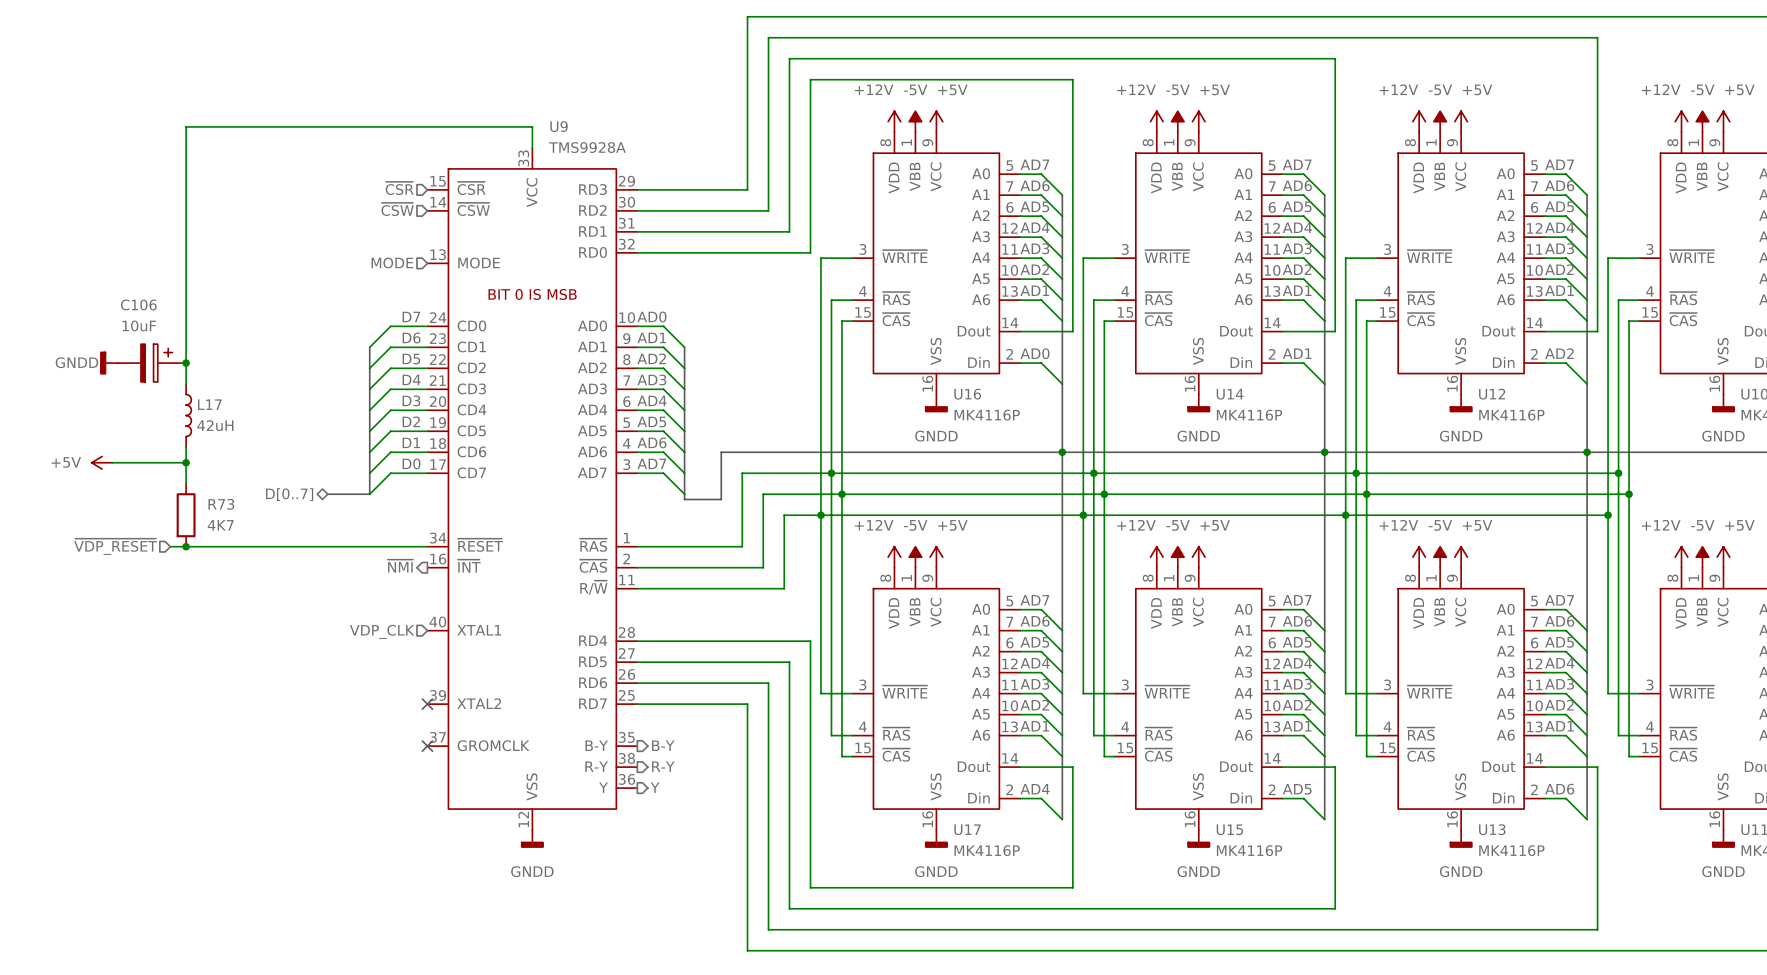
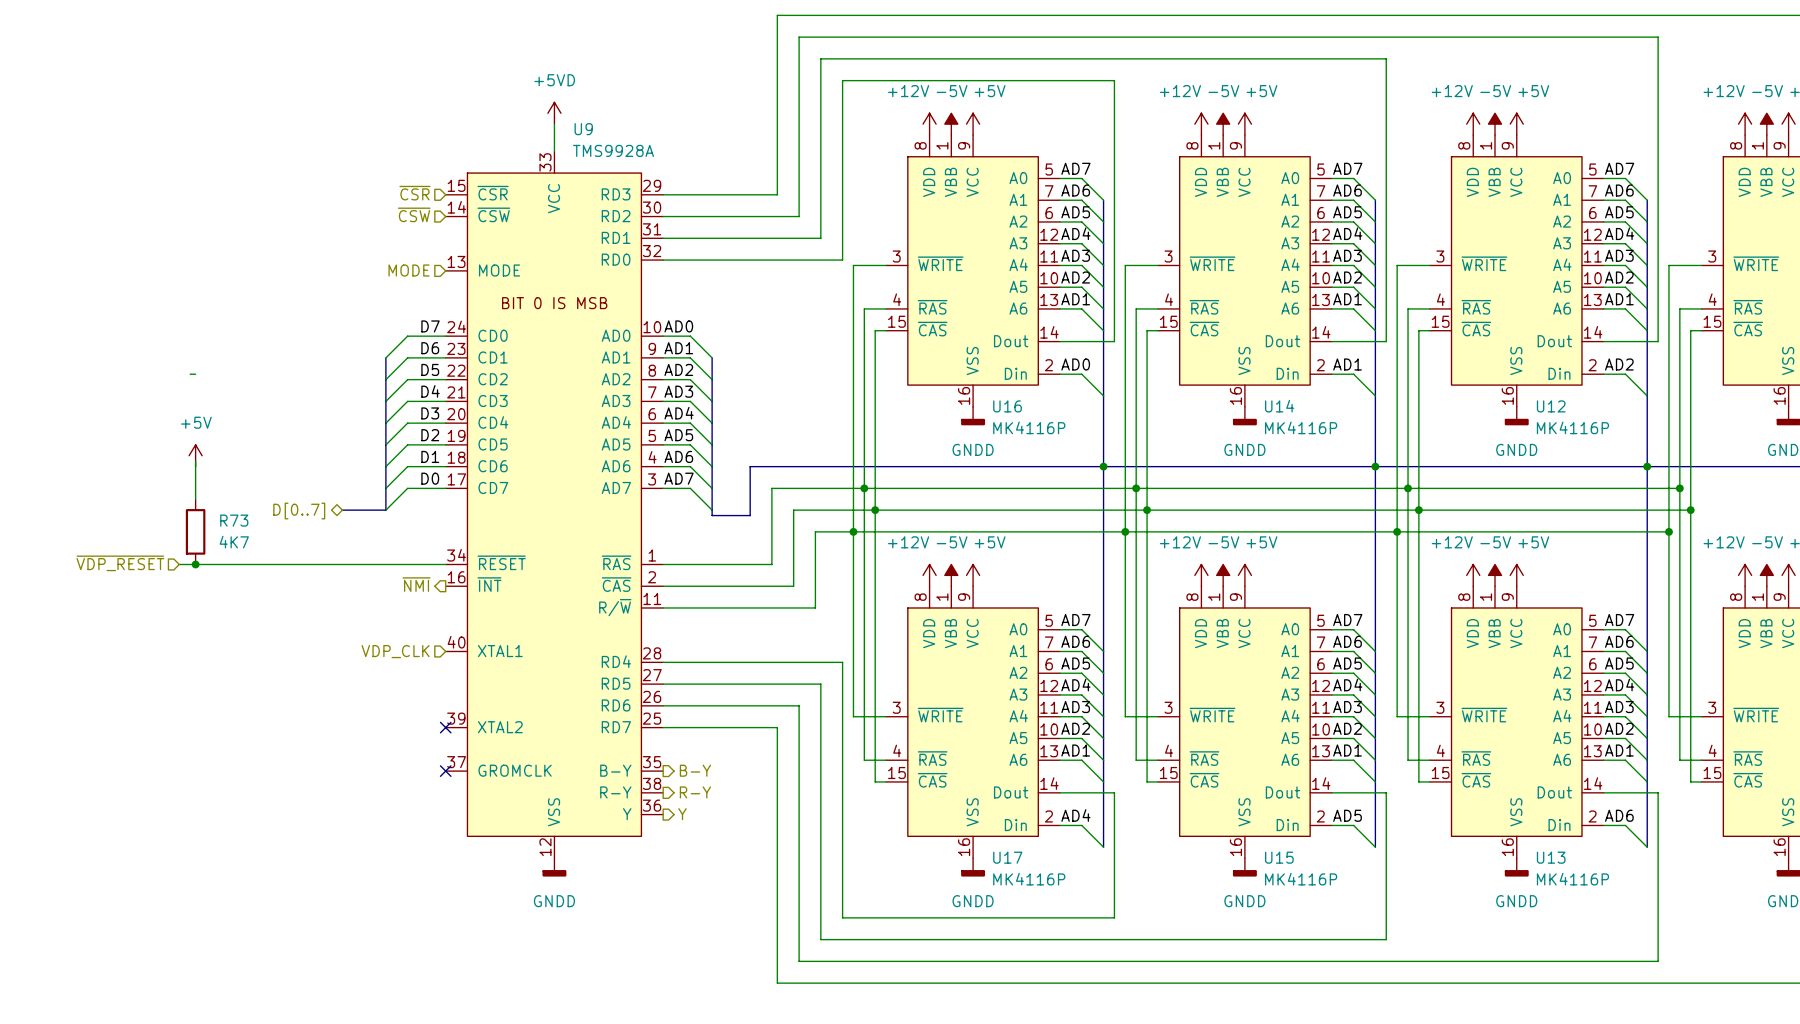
power symbol: none -> +5VD (554, 113)
wire: (532, 126) (186, 126) (186, 384) -> (554, 129) (554, 124)
power symbol: GNDD (108, 363) -> none
C106: 10uF (149, 363) -> none
junction: (186, 363) -> none
L17: 42uH (188, 415) -> none
power symbol rotation: 0° (102, 462) -> 90° clockwise (195, 455)
power symbol position: +5V (102, 462) -> +5V (195, 455)
wire: (112, 462) (186, 462) -> none
junction: (186, 462) -> none

